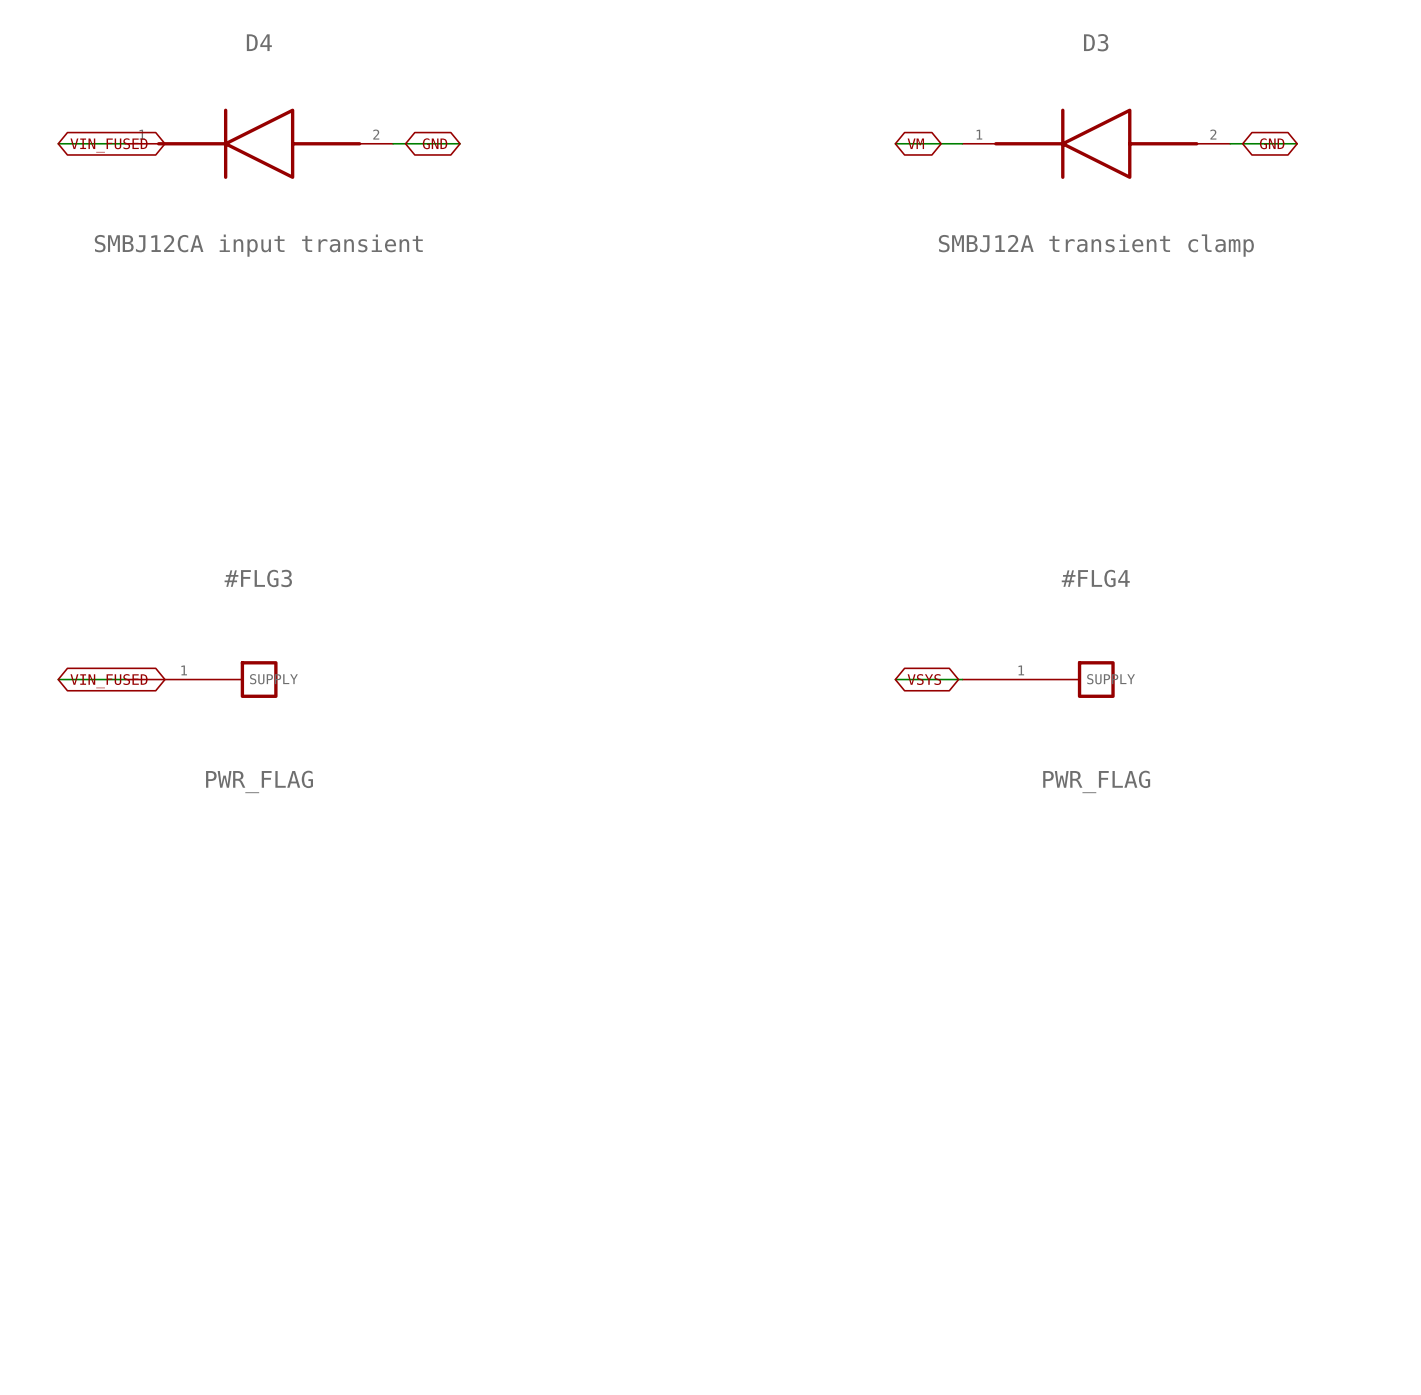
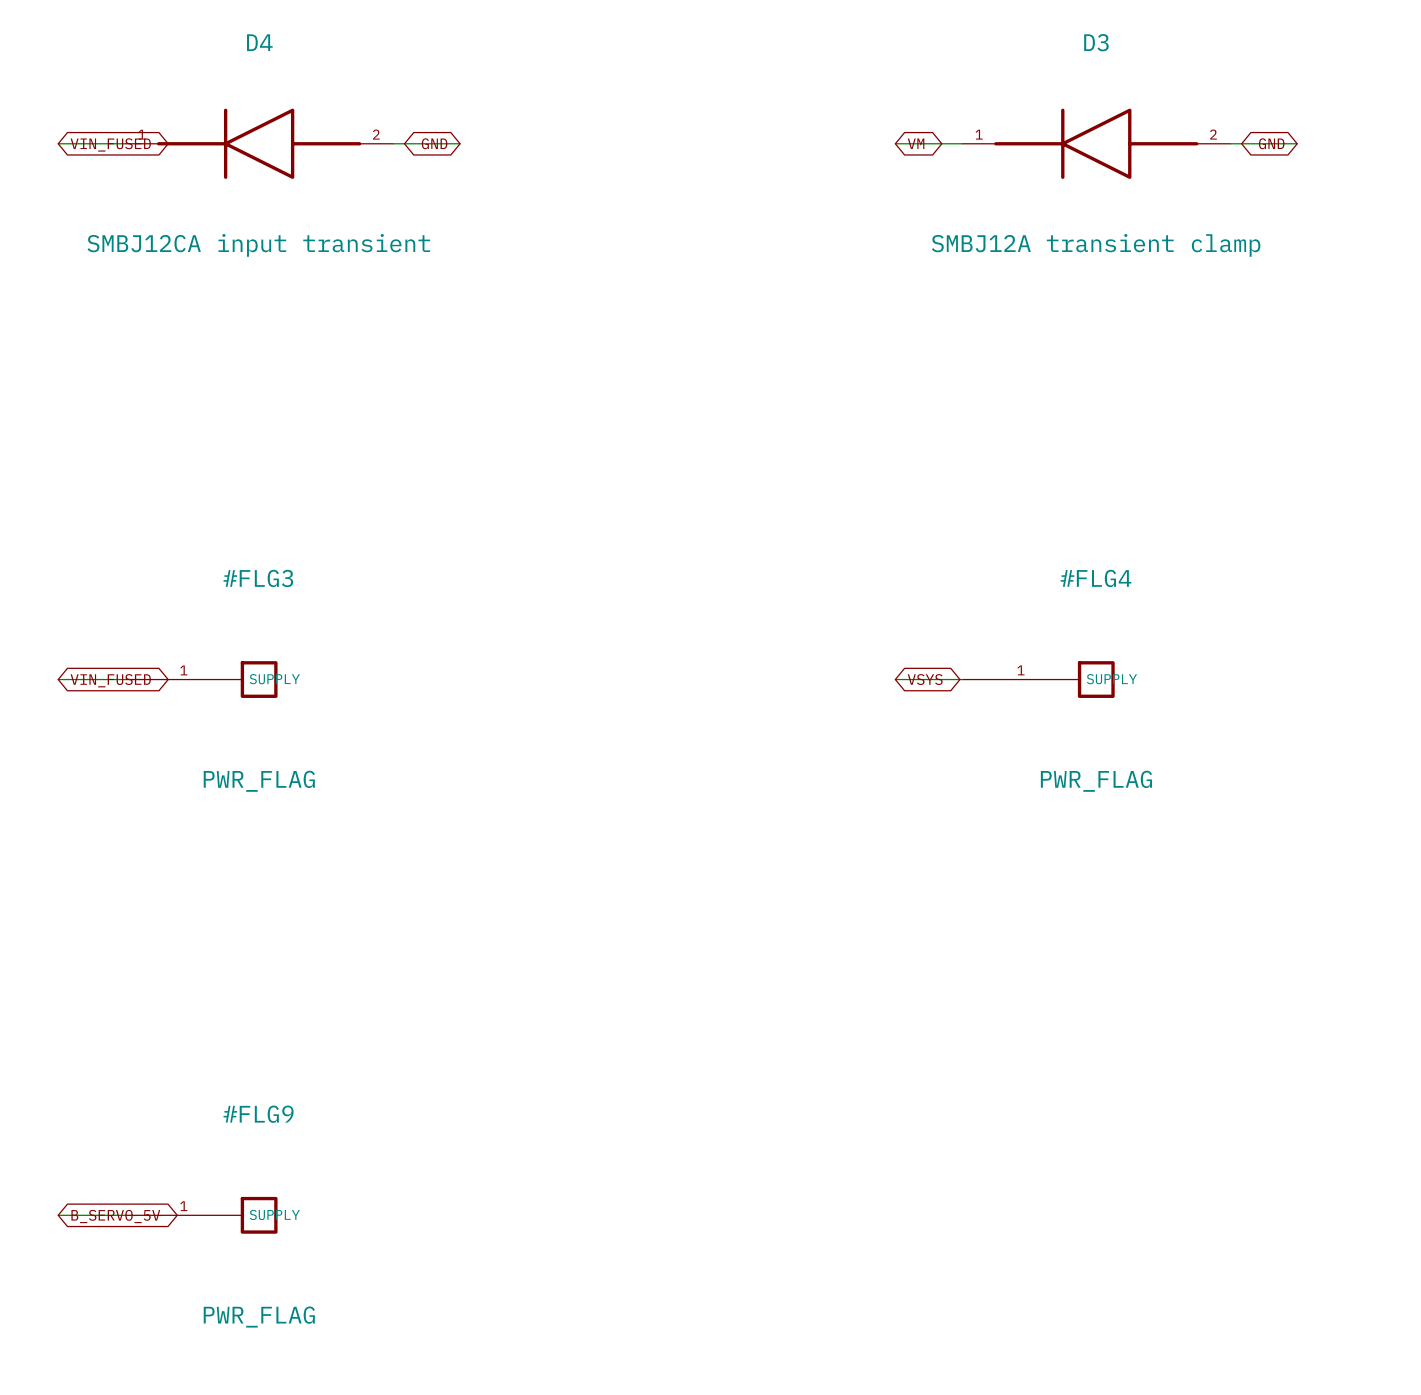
wire: none -> (58, 1215) (125, 1215)
#FLG9: none -> PWR_FLAG (201, 1215)
global label: none -> B_SERVO_5V (115, 1216)

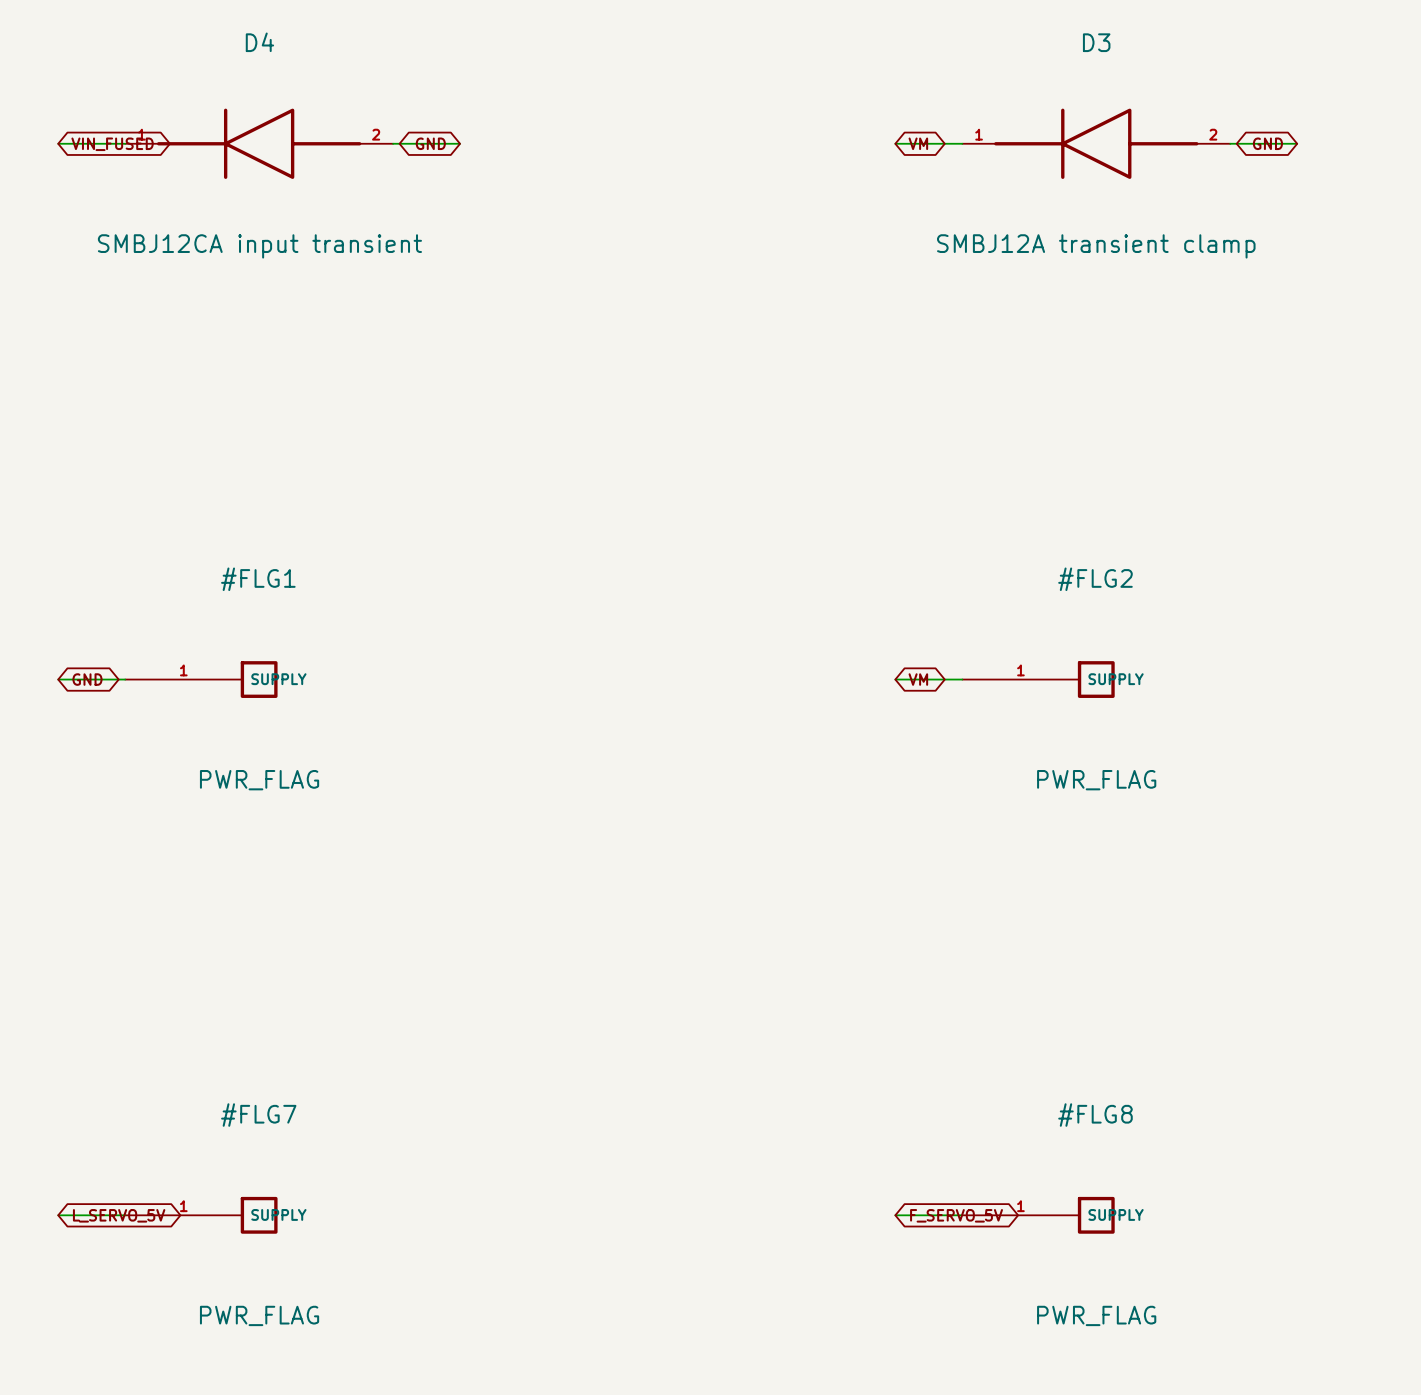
#FLG3 name: #FLG3 (258, 578) -> #FLG1 (258, 579)
#FLG4 name: #FLG4 (1096, 578) -> #FLG2 (1095, 579)
global label: VSYS (925, 679) -> VM (918, 679)
global label: VIN_FUSED (110, 680) -> GND (87, 679)
#FLG9 name: #FLG9 (258, 1114) -> #FLG7 (258, 1115)
wire: none -> (895, 1215) (962, 1215)
#FLG8: none -> PWR_FLAG (1038, 1215)
global label: B_SERVO_5V (115, 1216) -> L_SERVO_5V (119, 1215)
global label: none -> F_SERVO_5V (956, 1215)

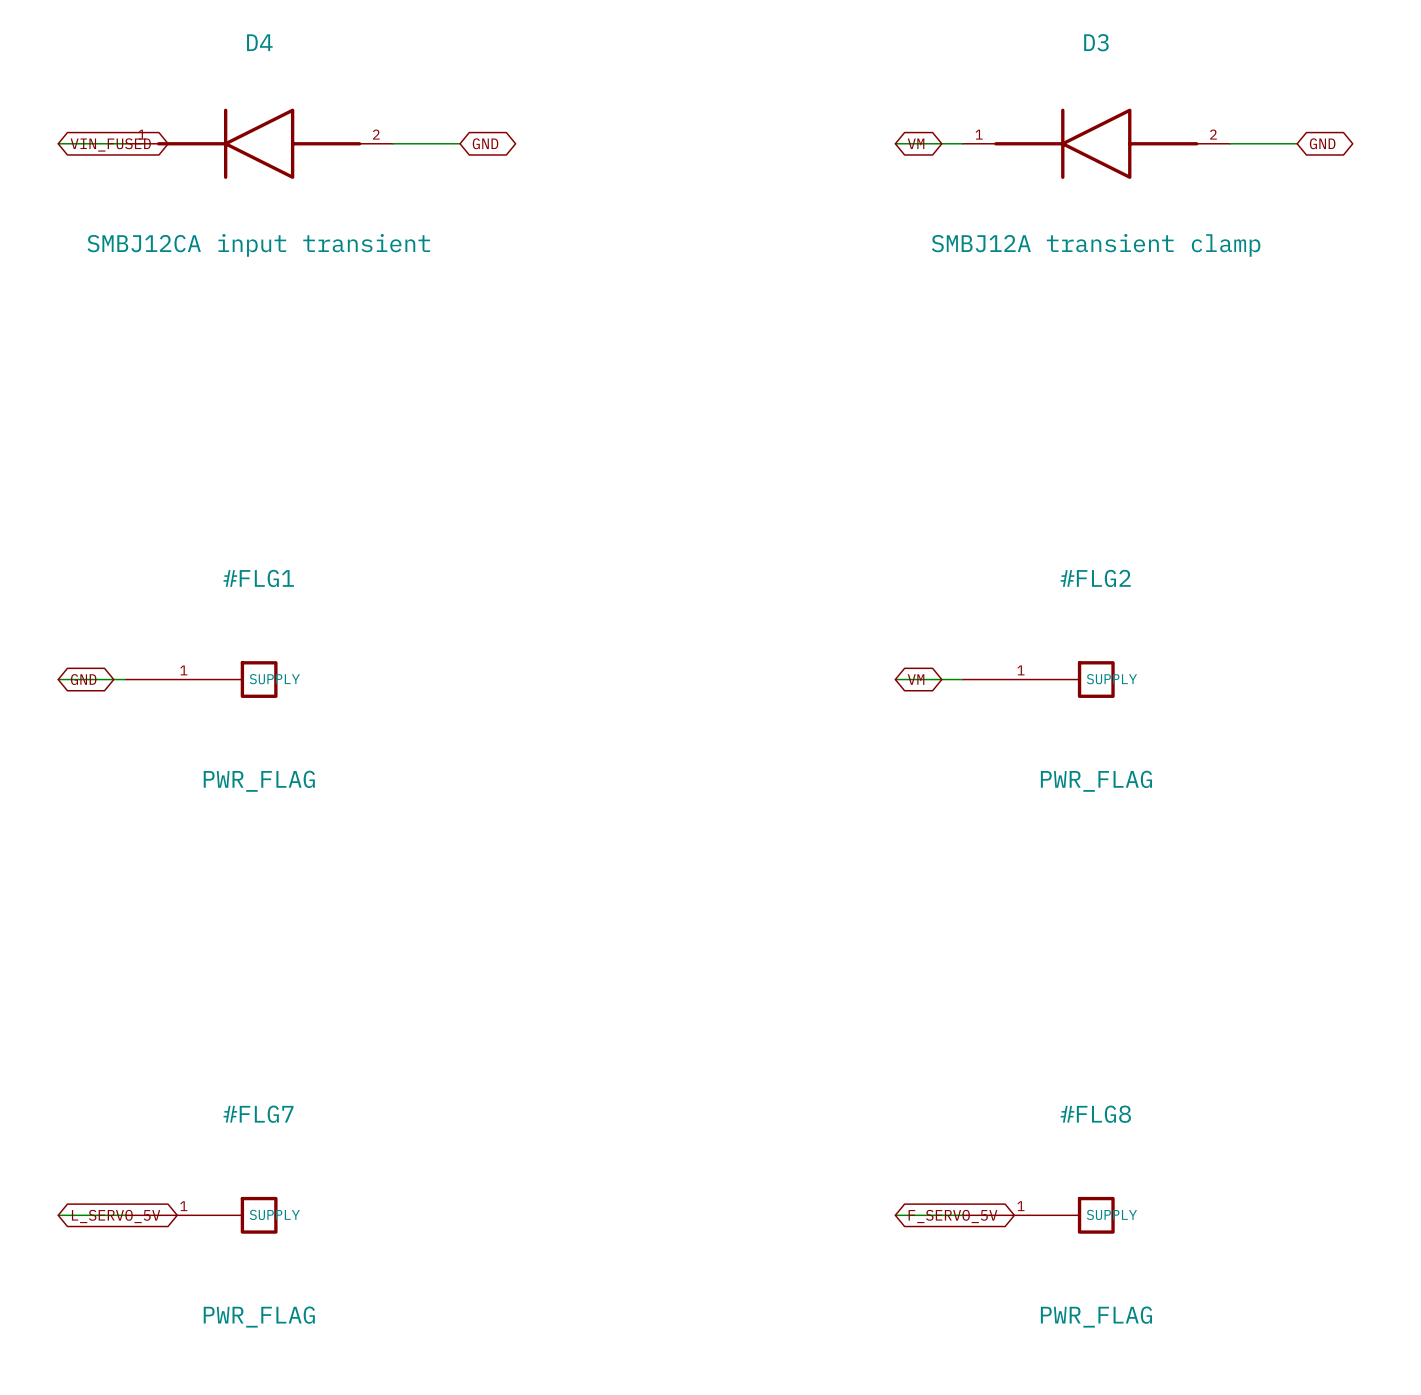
global label rotation: 0° (430, 143) -> 180° (485, 143)
global label rotation: 0° (1267, 143) -> 180° (1322, 143)

